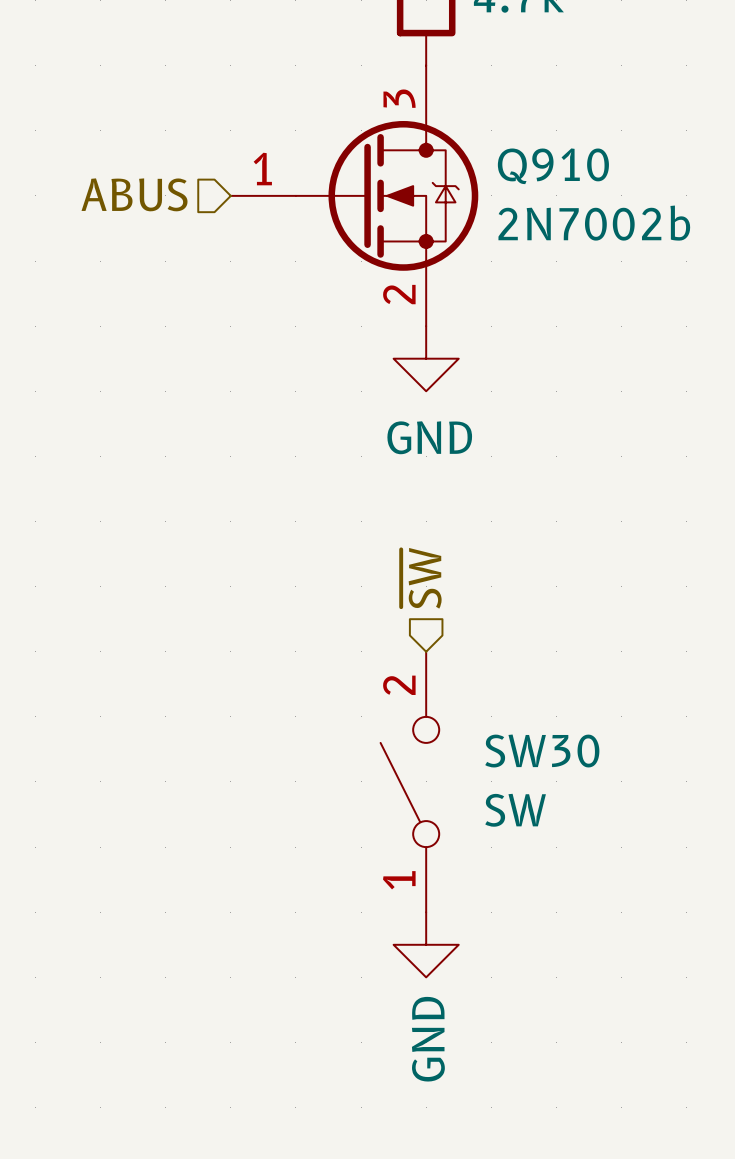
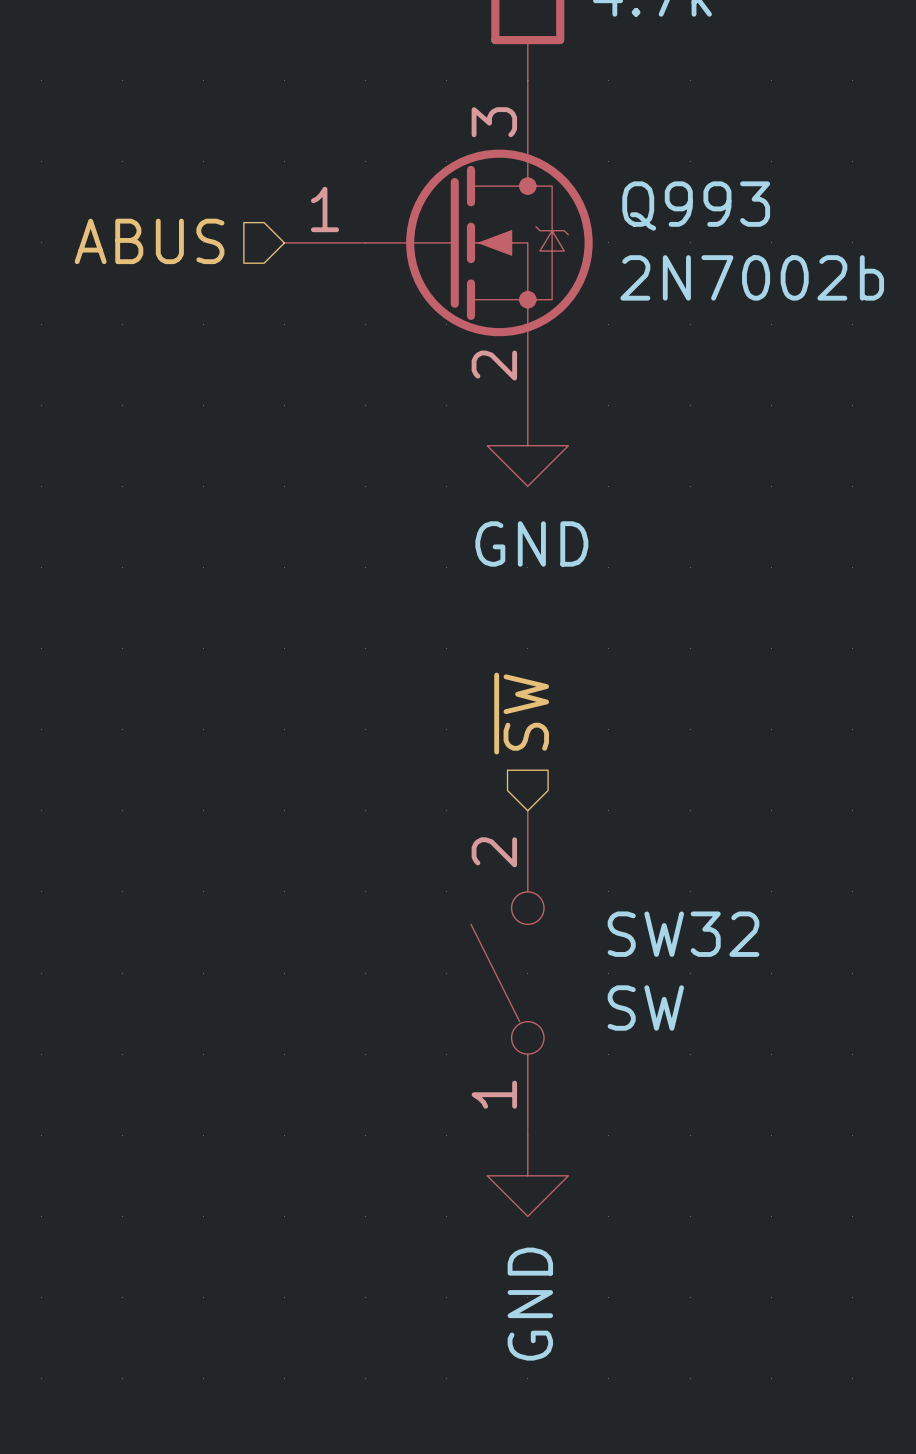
Q910 name: Q910 (553, 166) -> Q993 (696, 206)
SW30 name: SW30 (542, 751) -> SW32 (683, 934)

